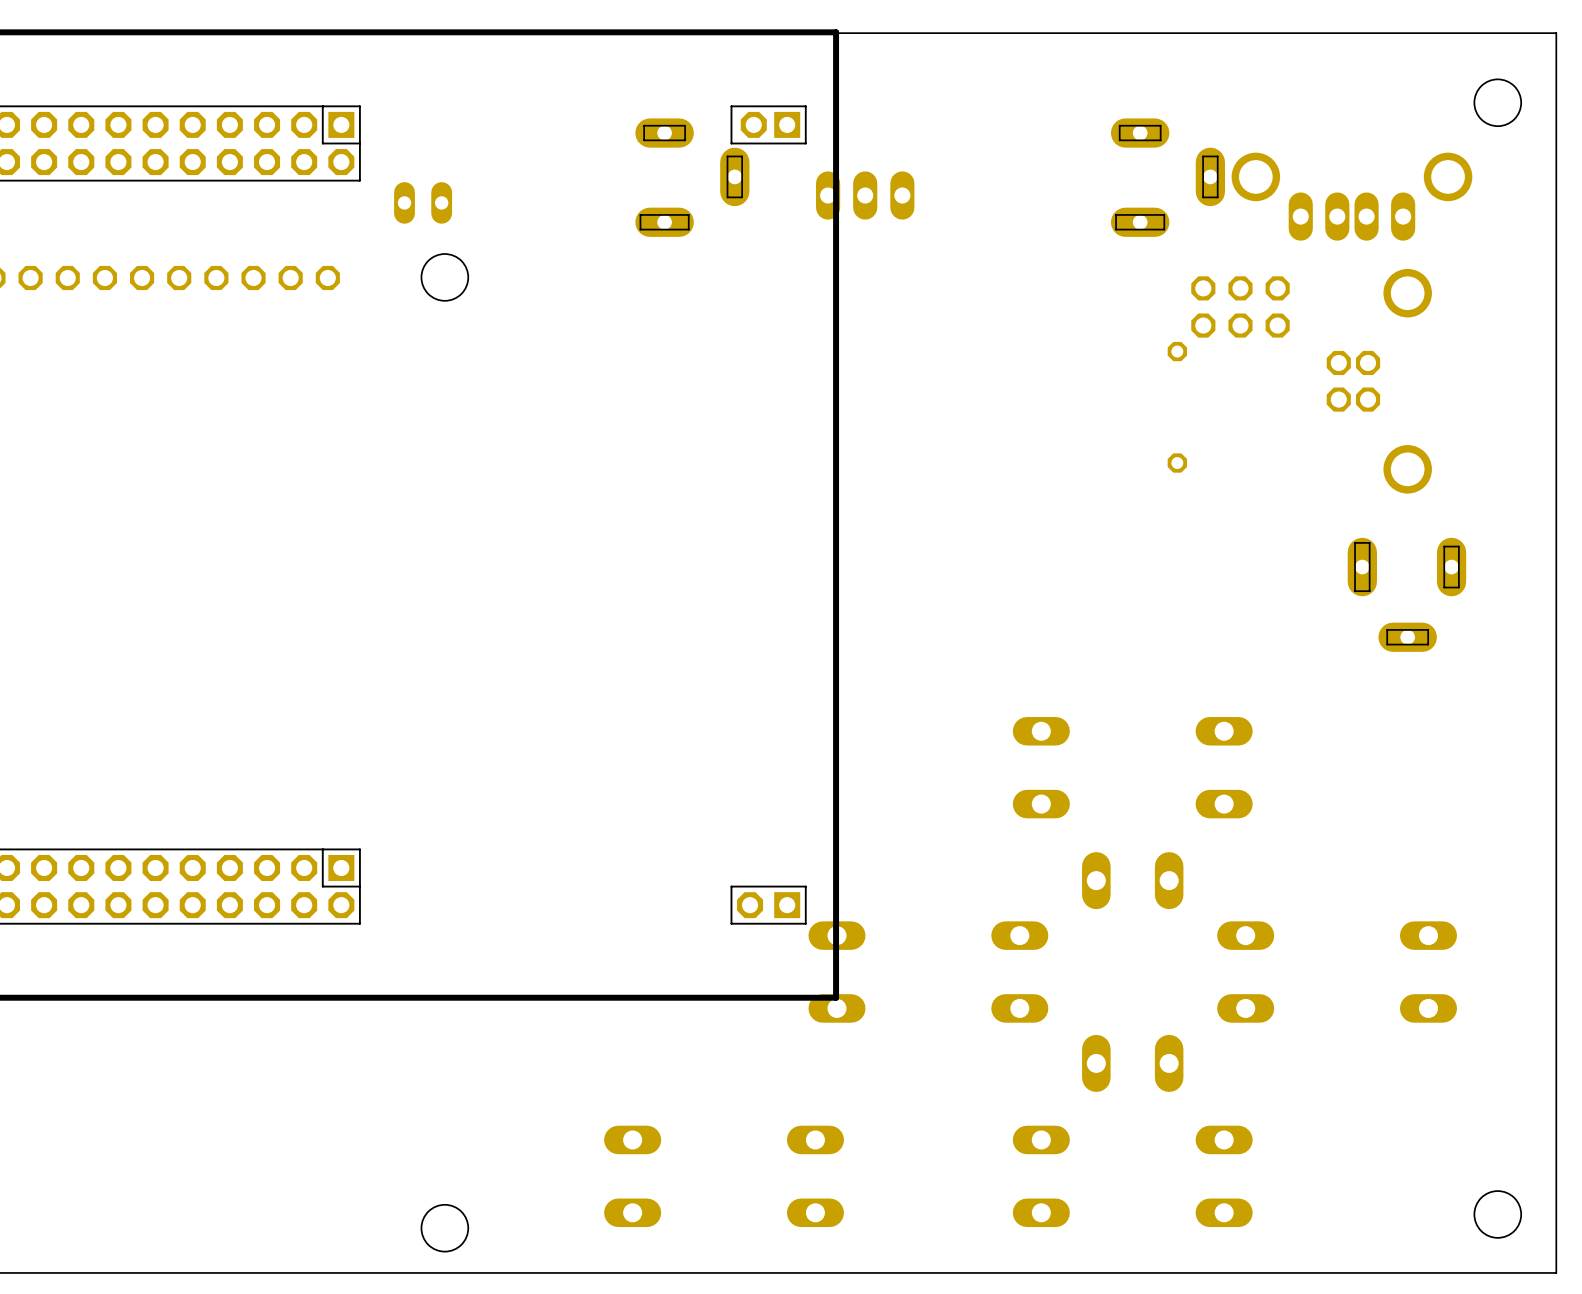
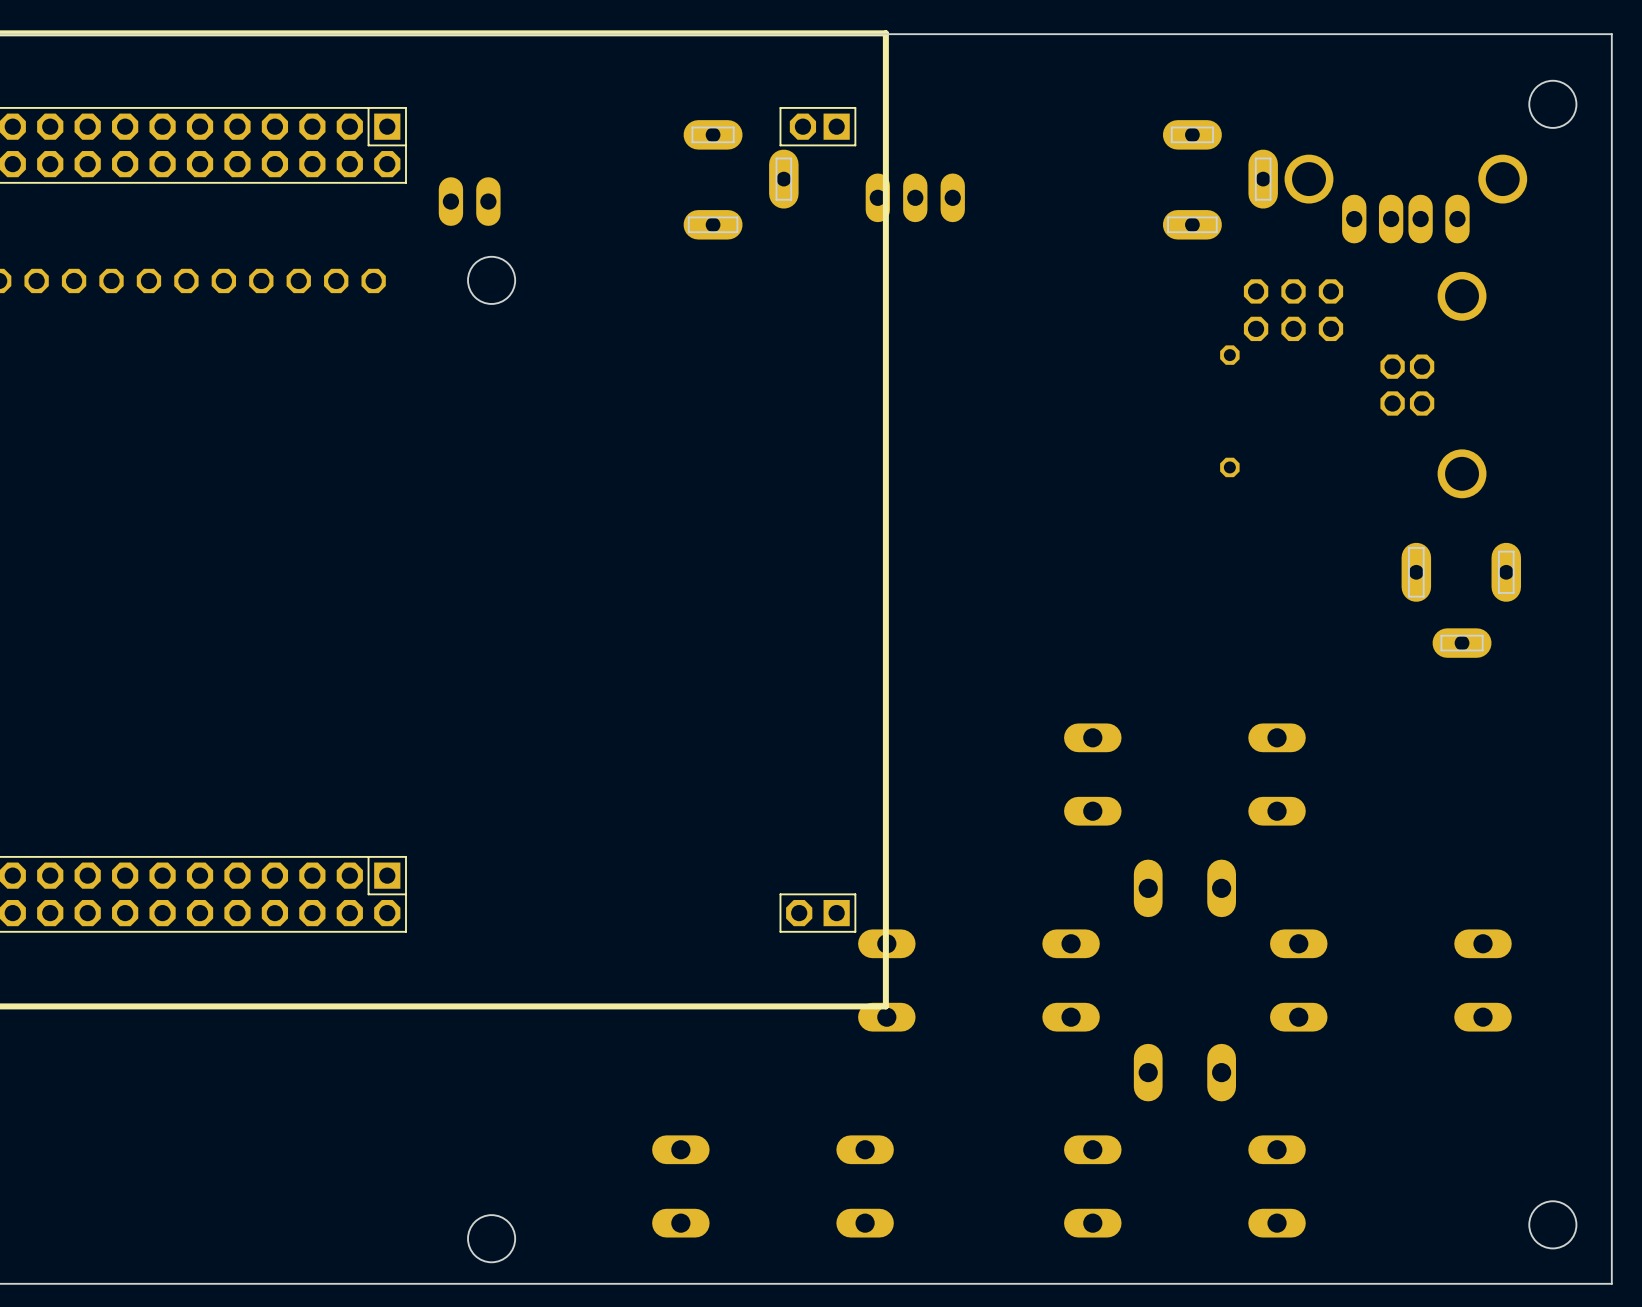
part footprint: [394, 182, 453, 224] -> [438, 177, 501, 226]

